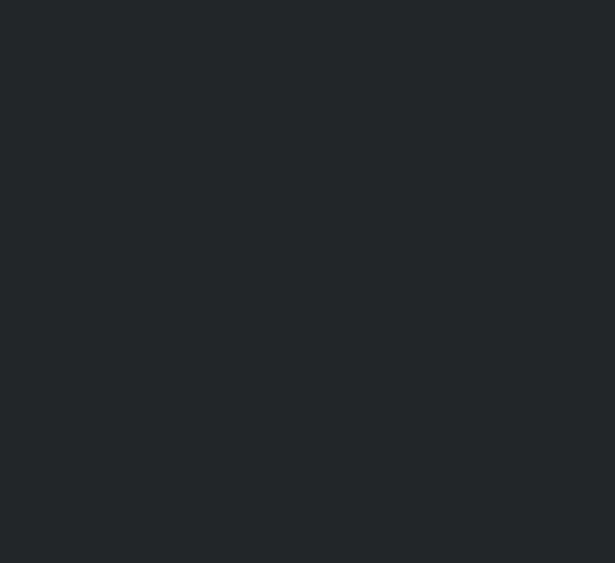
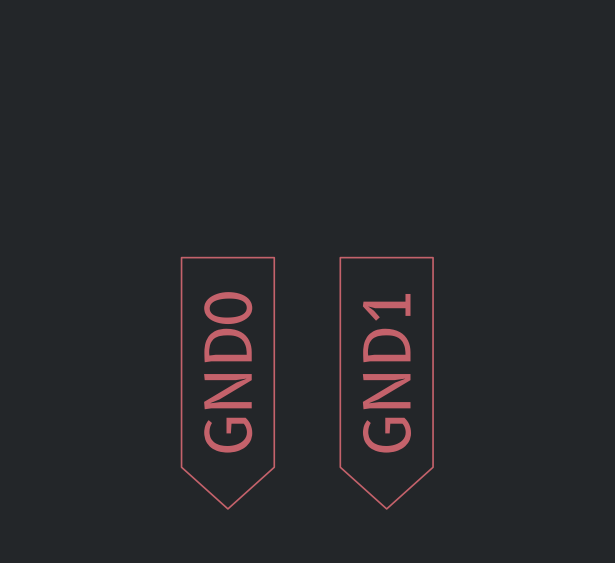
global label: none -> GND0 (228, 372)
global label: none -> GND1 (386, 373)

